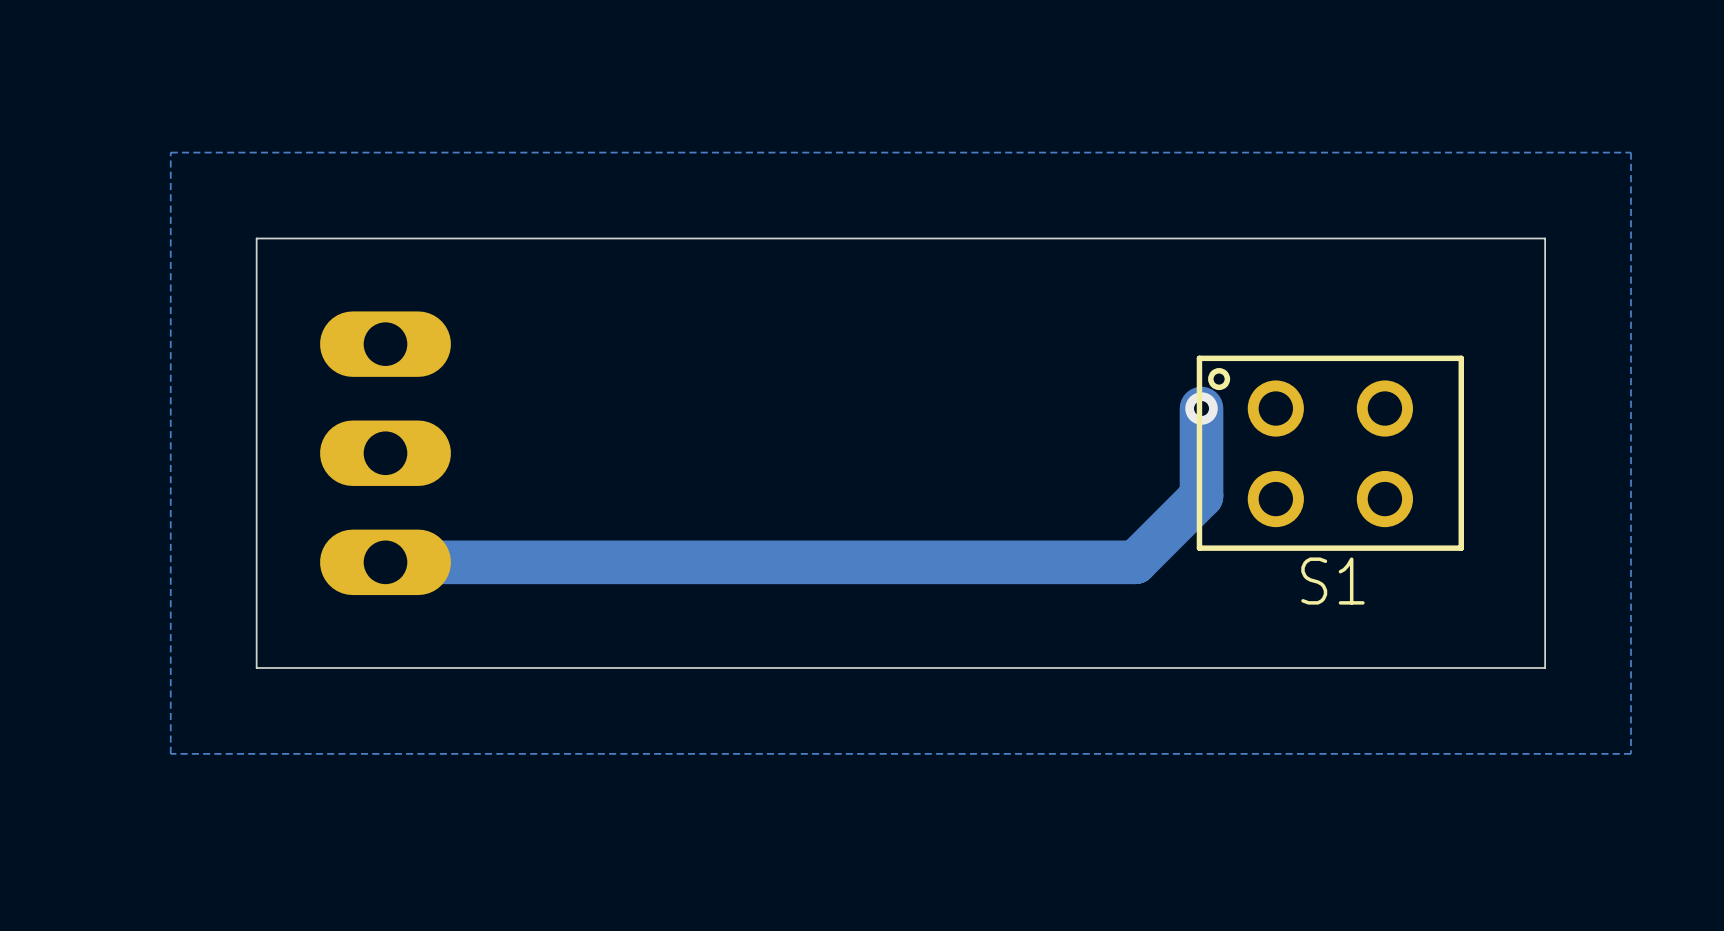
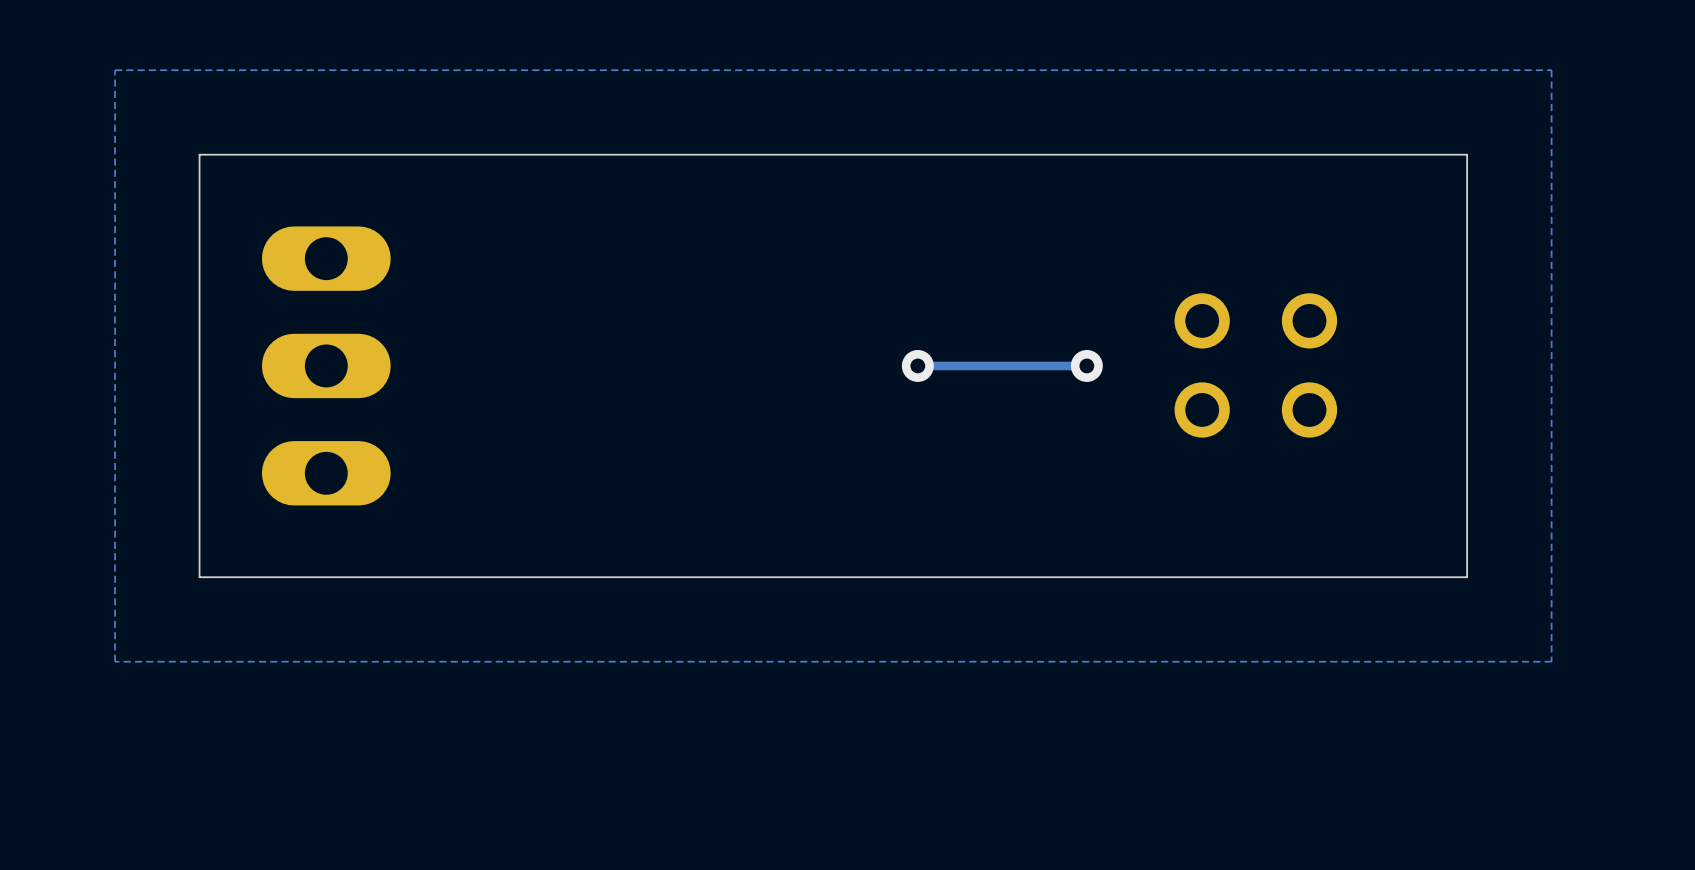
track: (1201, 408) (1201, 496) (1135, 562) (385, 562) -> none
via position: (1201, 408) -> (1086, 365)
part: none -> (1255, 365)
via: none -> (917, 365)
track: none -> (1086, 365) (917, 365)
S1: (1330, 453) -> none

